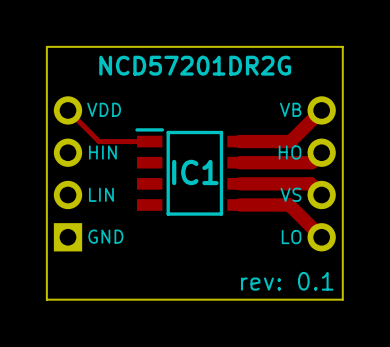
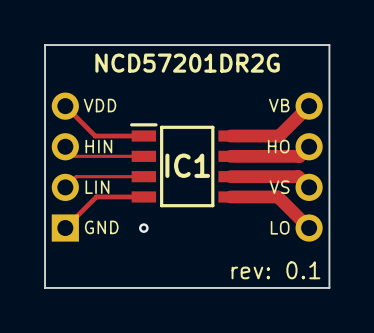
track: none -> (65, 146) (74, 156) (143, 156)
track: none -> (143, 176) (76, 176) (65, 187)
track: none -> (143, 196) (96, 196) (65, 228)
via: none -> (143, 228)

